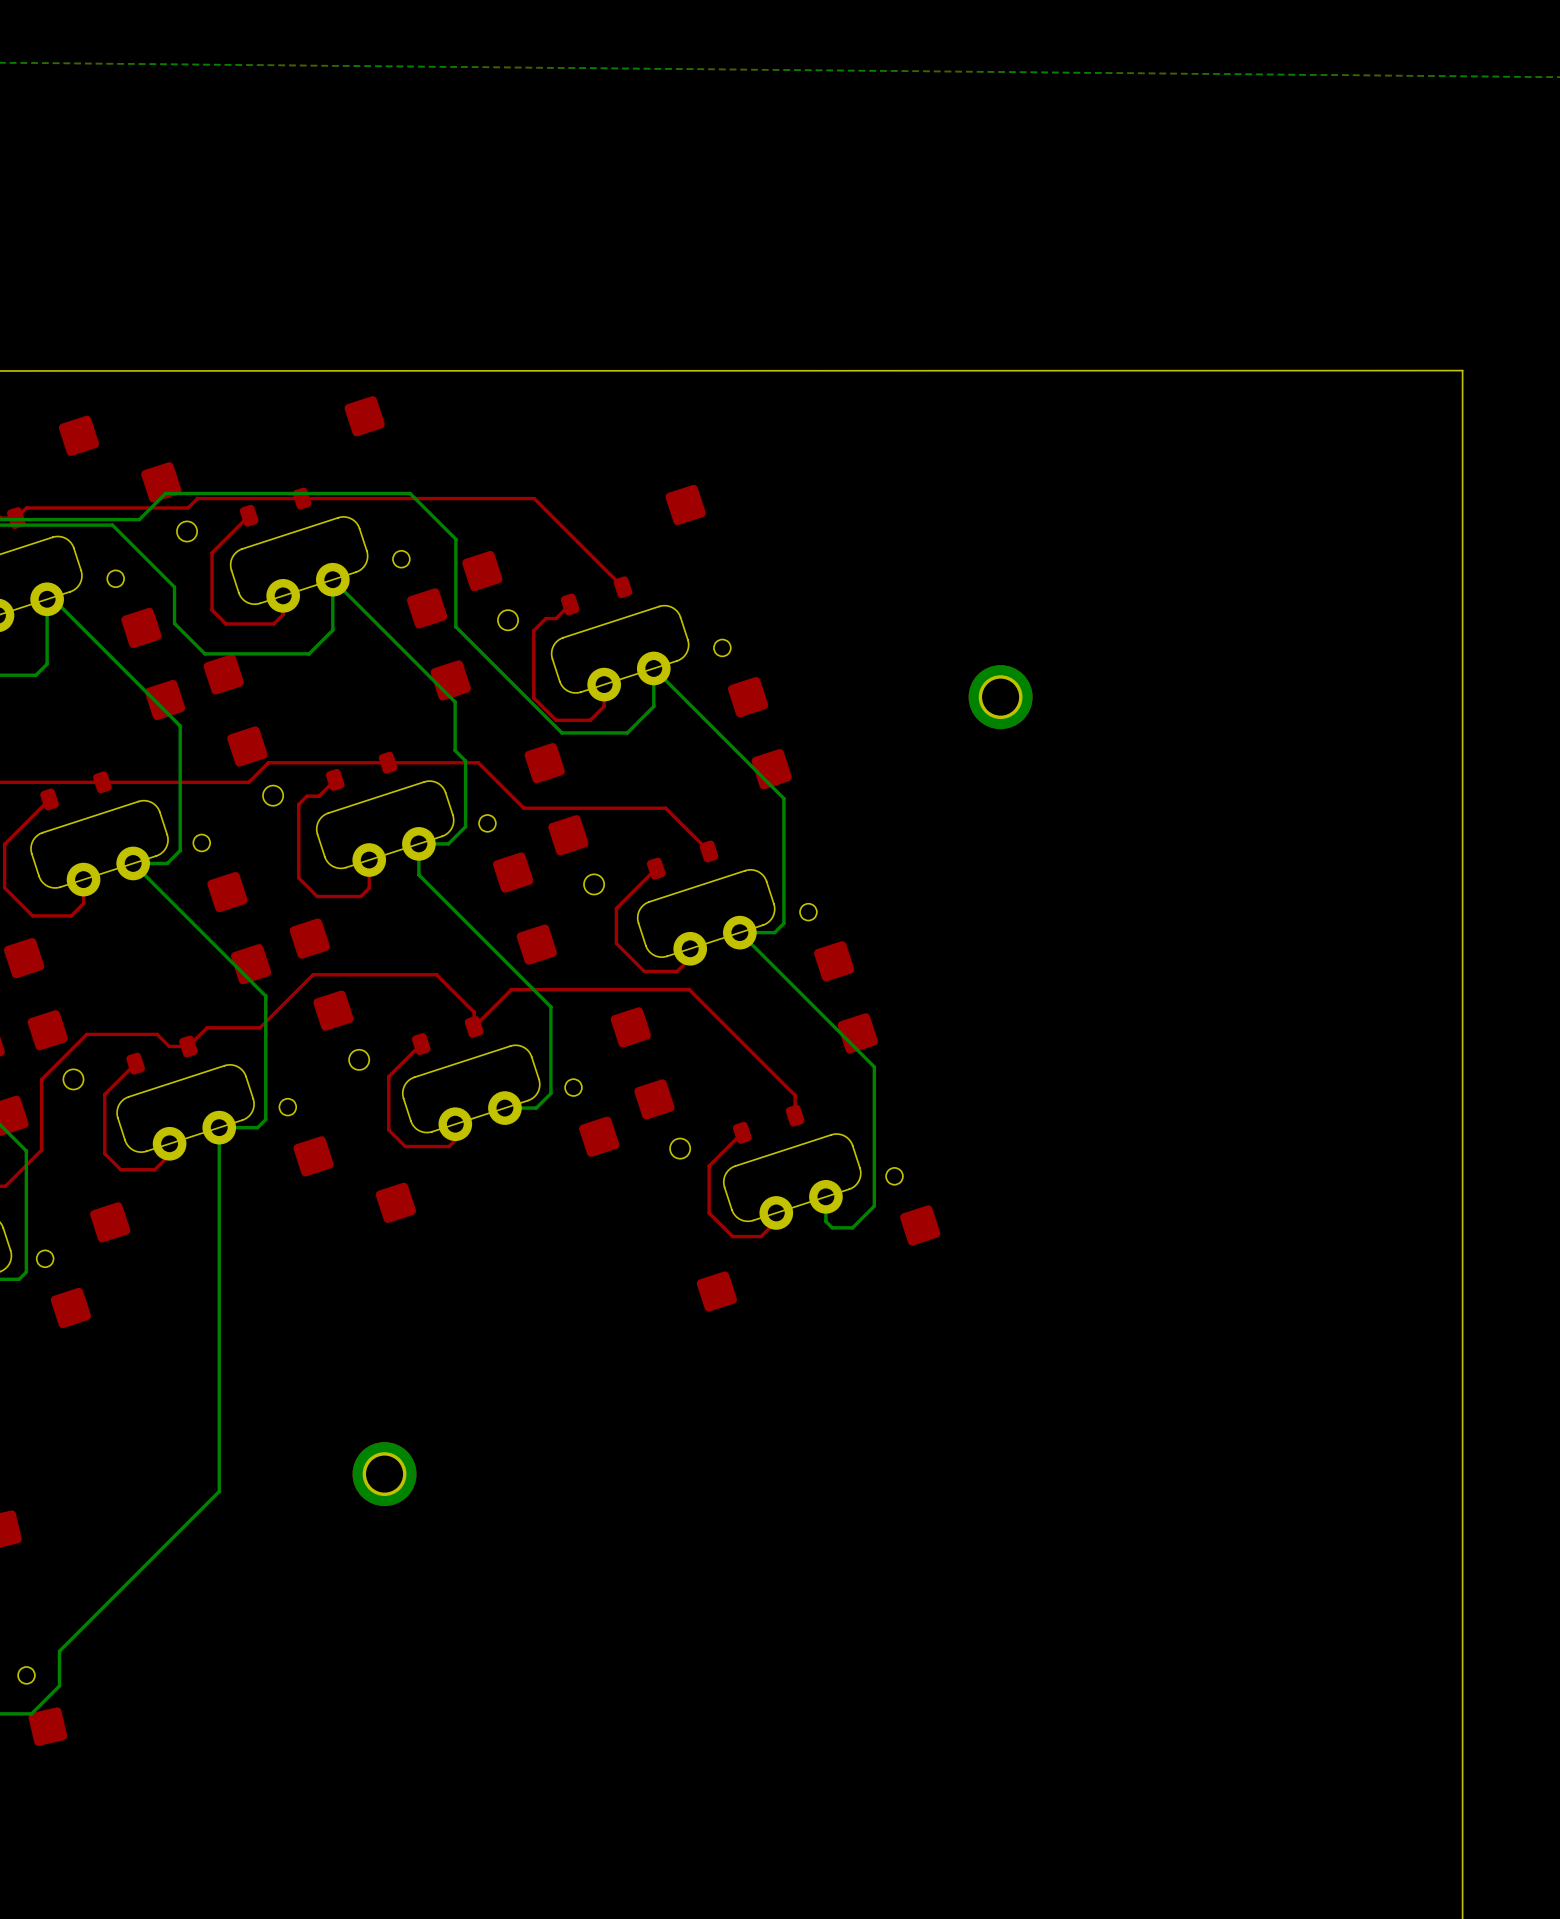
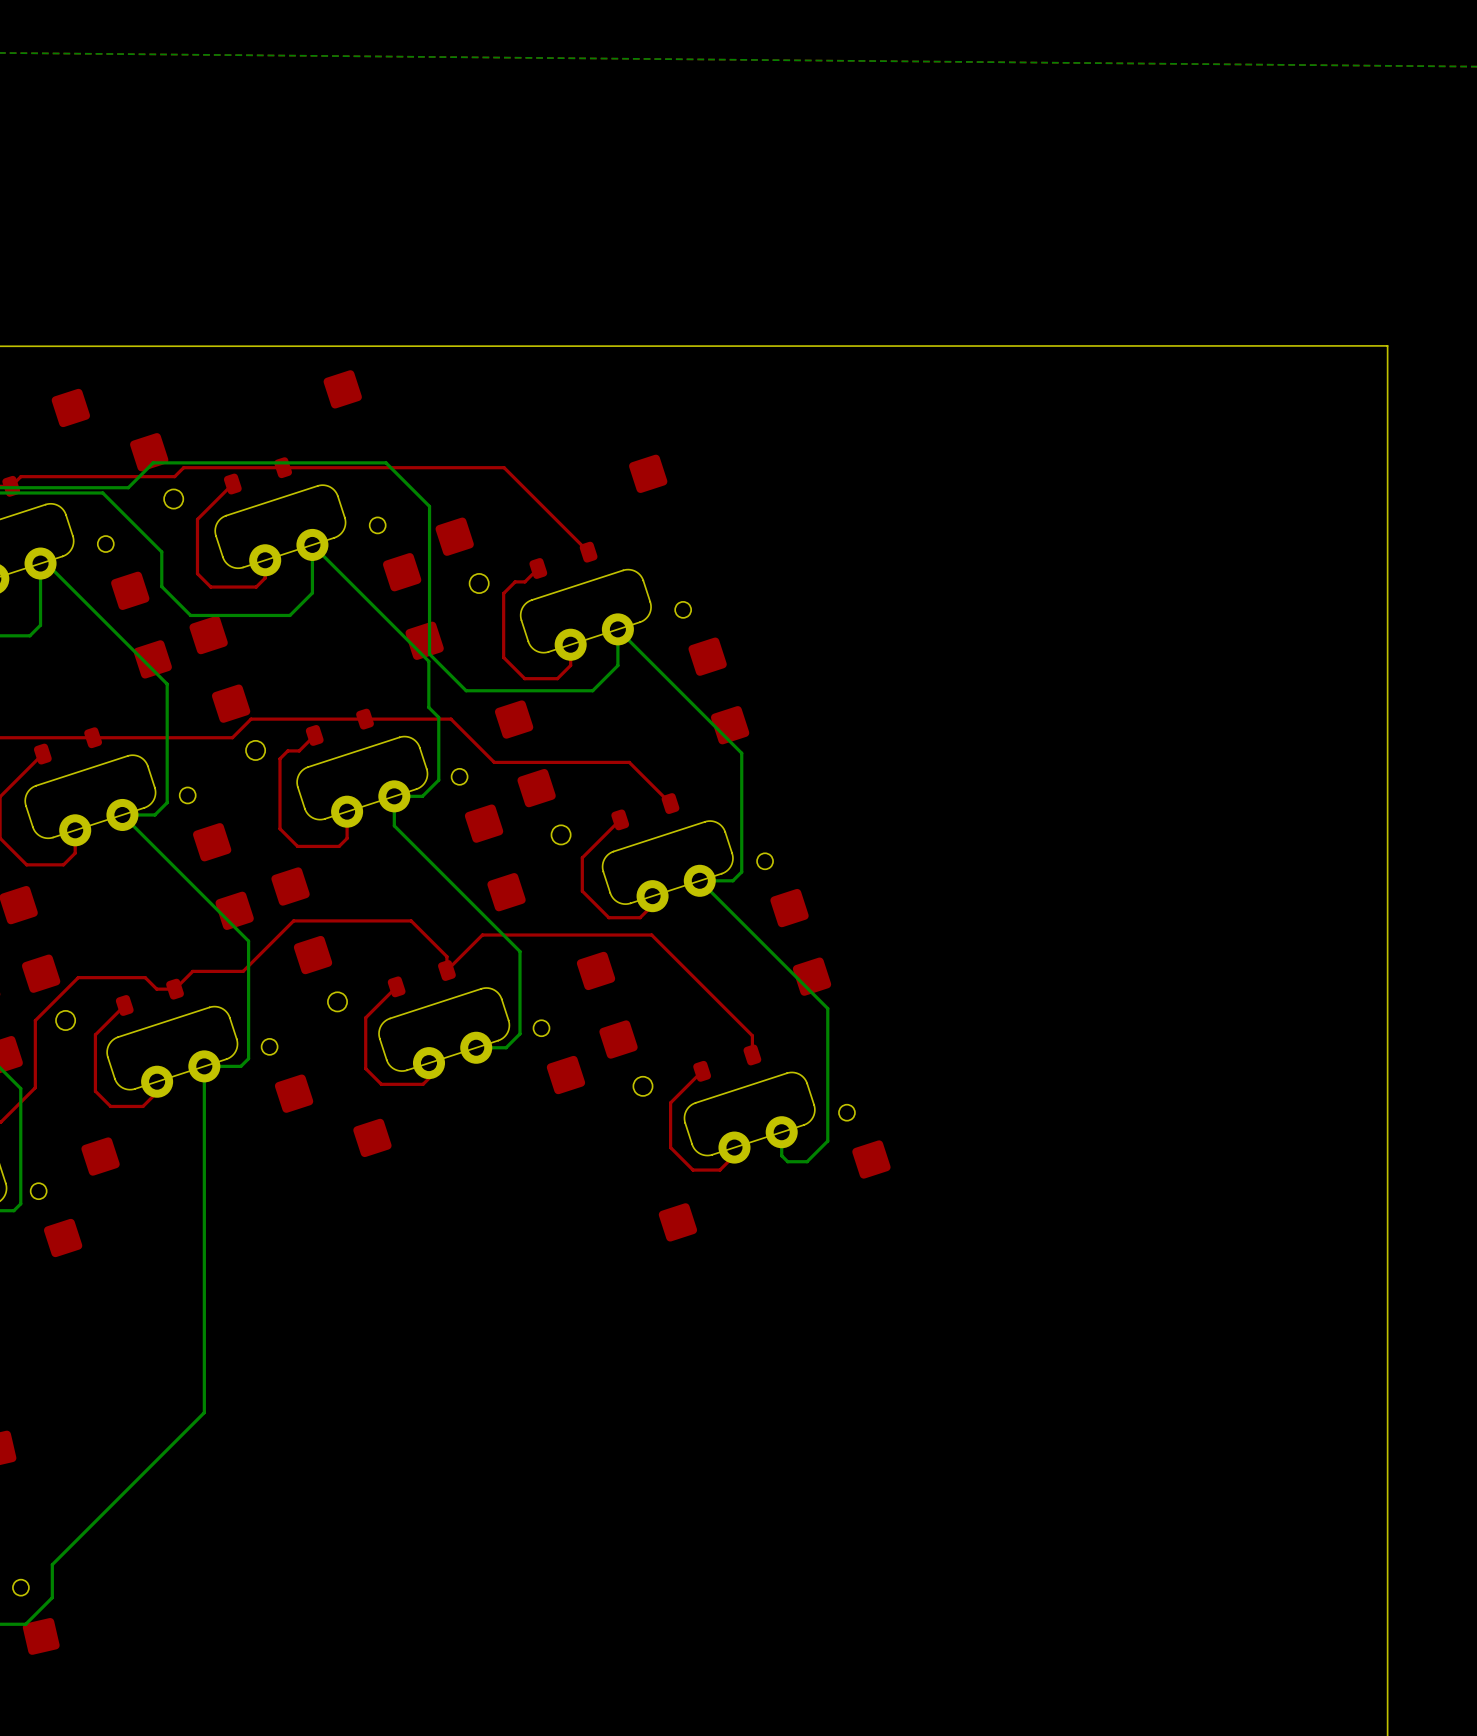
bottom track: (455, 626) (561, 732) -> (429, 589) (429, 654) (466, 690) (530, 690)
part: (1000, 697) -> none
part: (384, 1474) -> none

